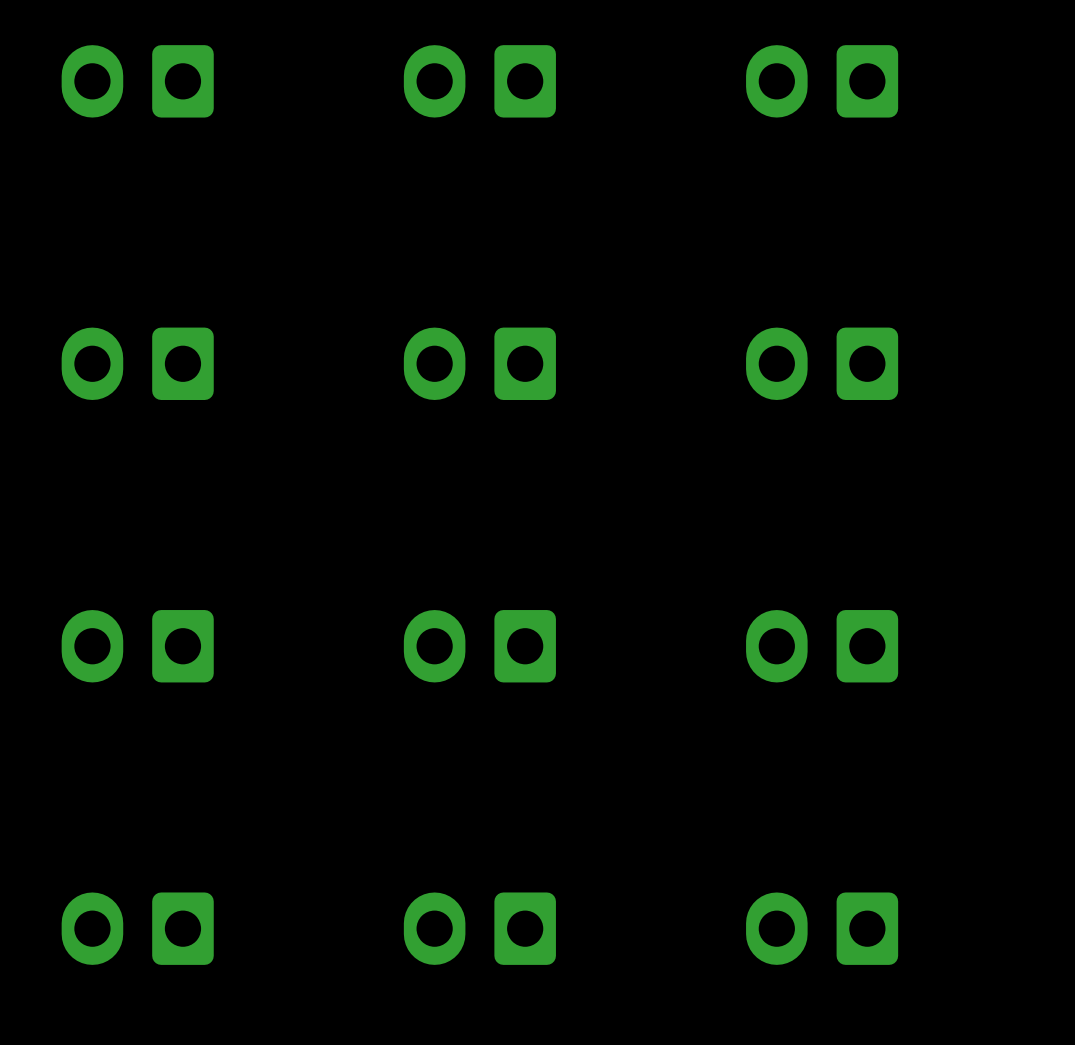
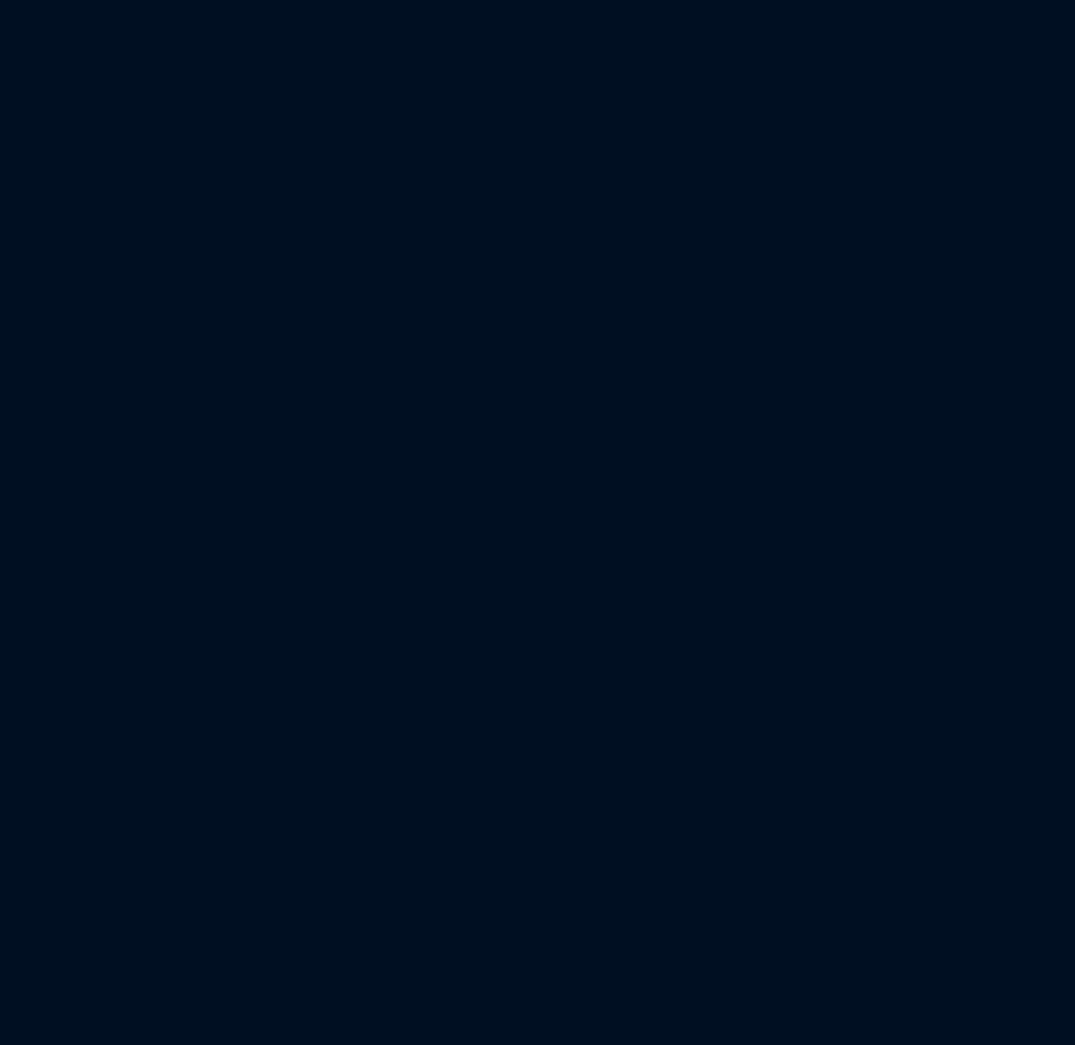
part: (137, 81) -> none
part: (479, 81) -> none
part: (822, 81) -> none
part: (137, 363) -> none
part: (479, 363) -> none
part: (822, 363) -> none
part: (137, 646) -> none
part: (479, 646) -> none
part: (822, 646) -> none
part: (137, 928) -> none
part: (479, 928) -> none
part: (822, 928) -> none

